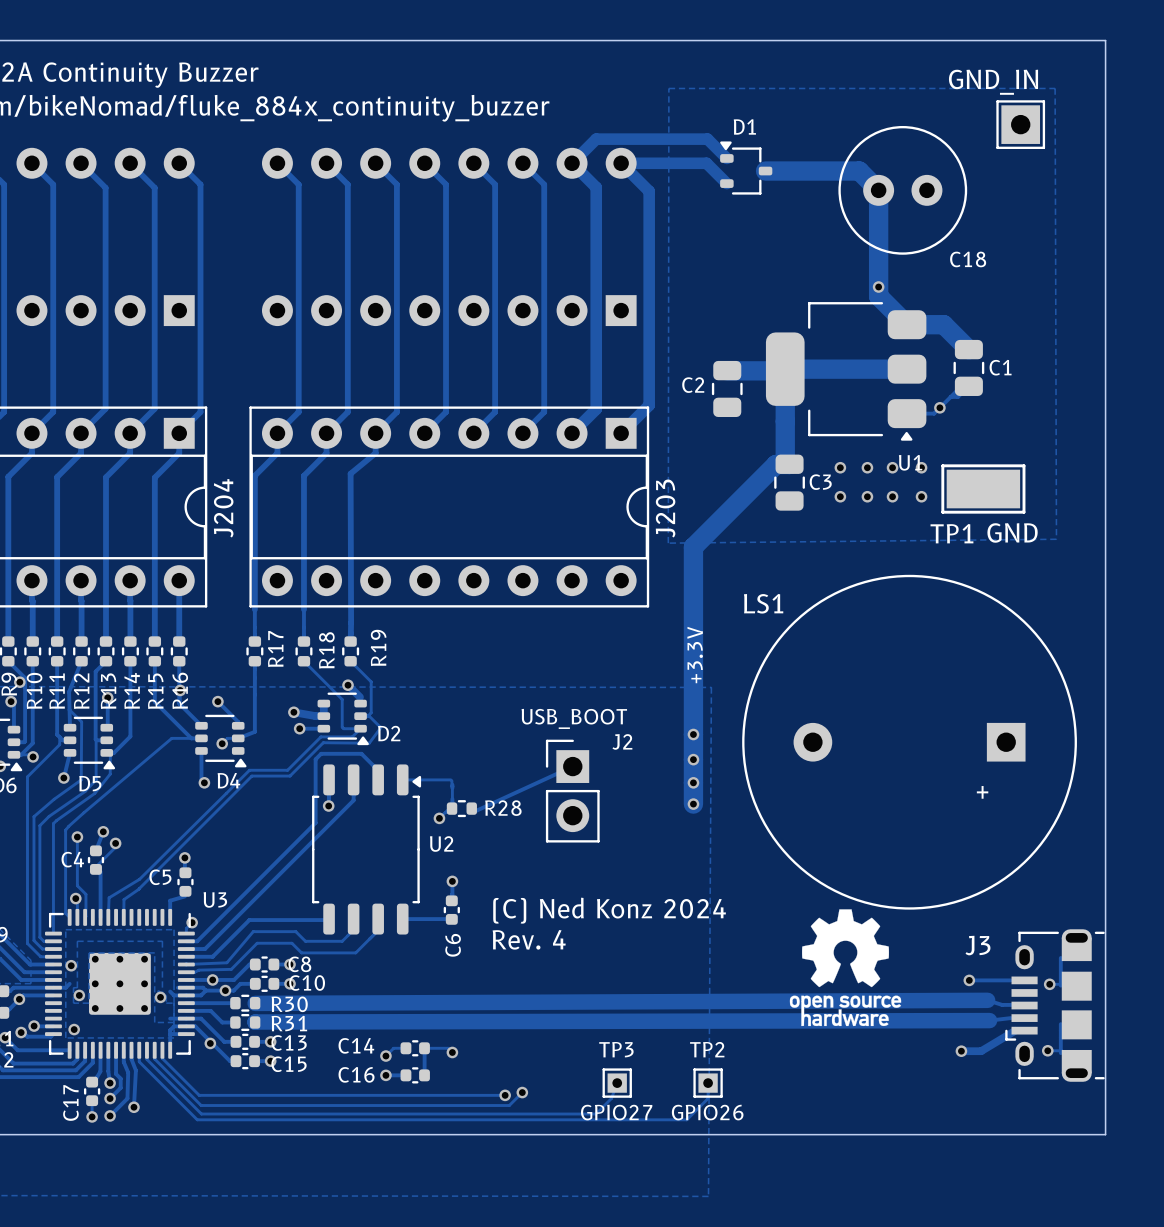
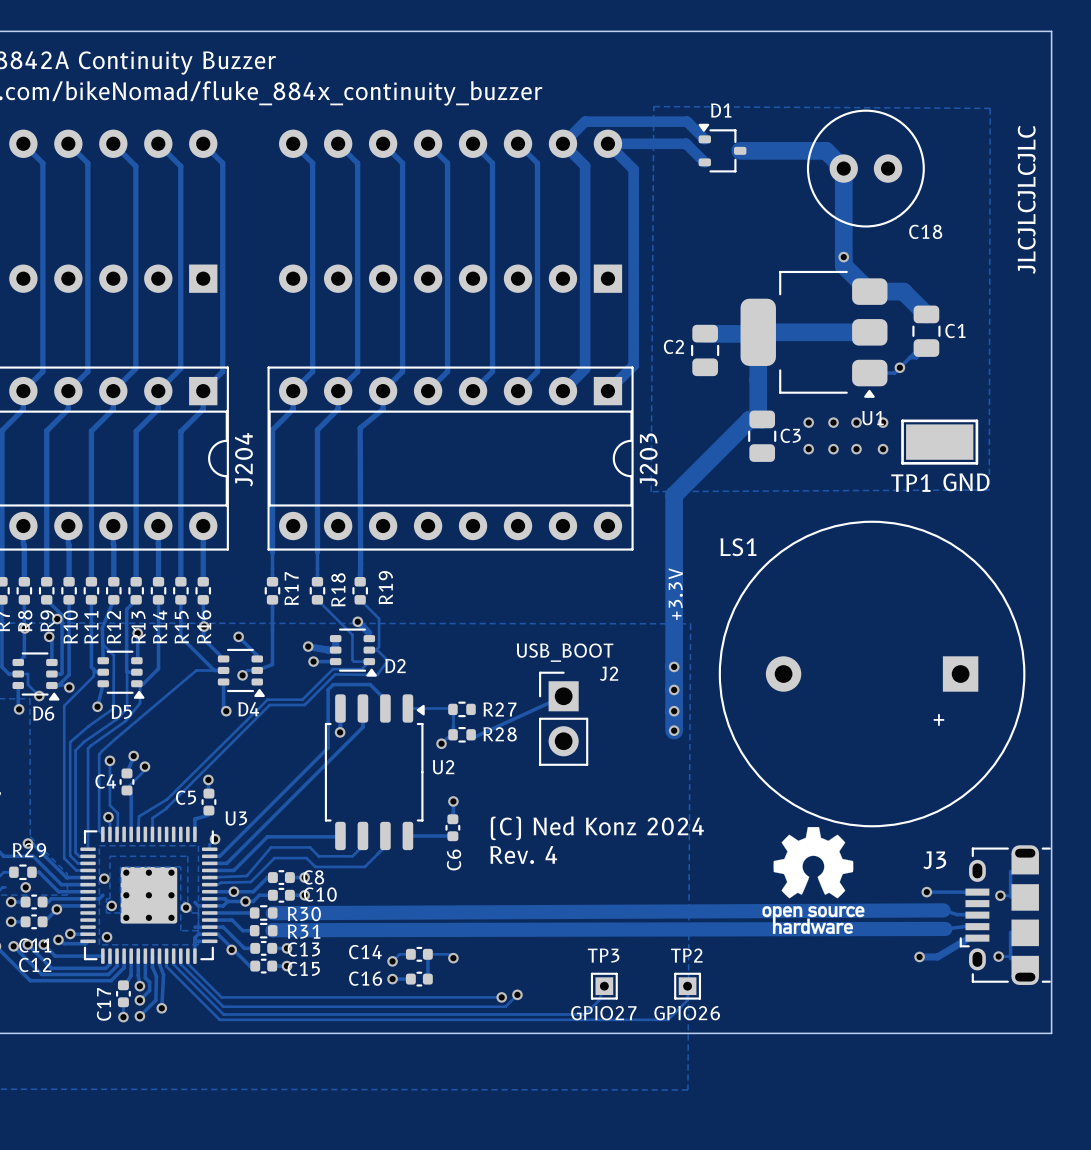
text: GND_IN (993, 82) -> none
zone outline: (668, 88) (1055, 88) (1056, 539) (668, 543) (668, 88) -> (653, 106) (651, 491) (989, 489) (990, 108) (653, 106)
part: (1020, 124) -> none
text: none -> JLCJLCJLCJLC (1026, 199)
R27: none -> (461, 709)

